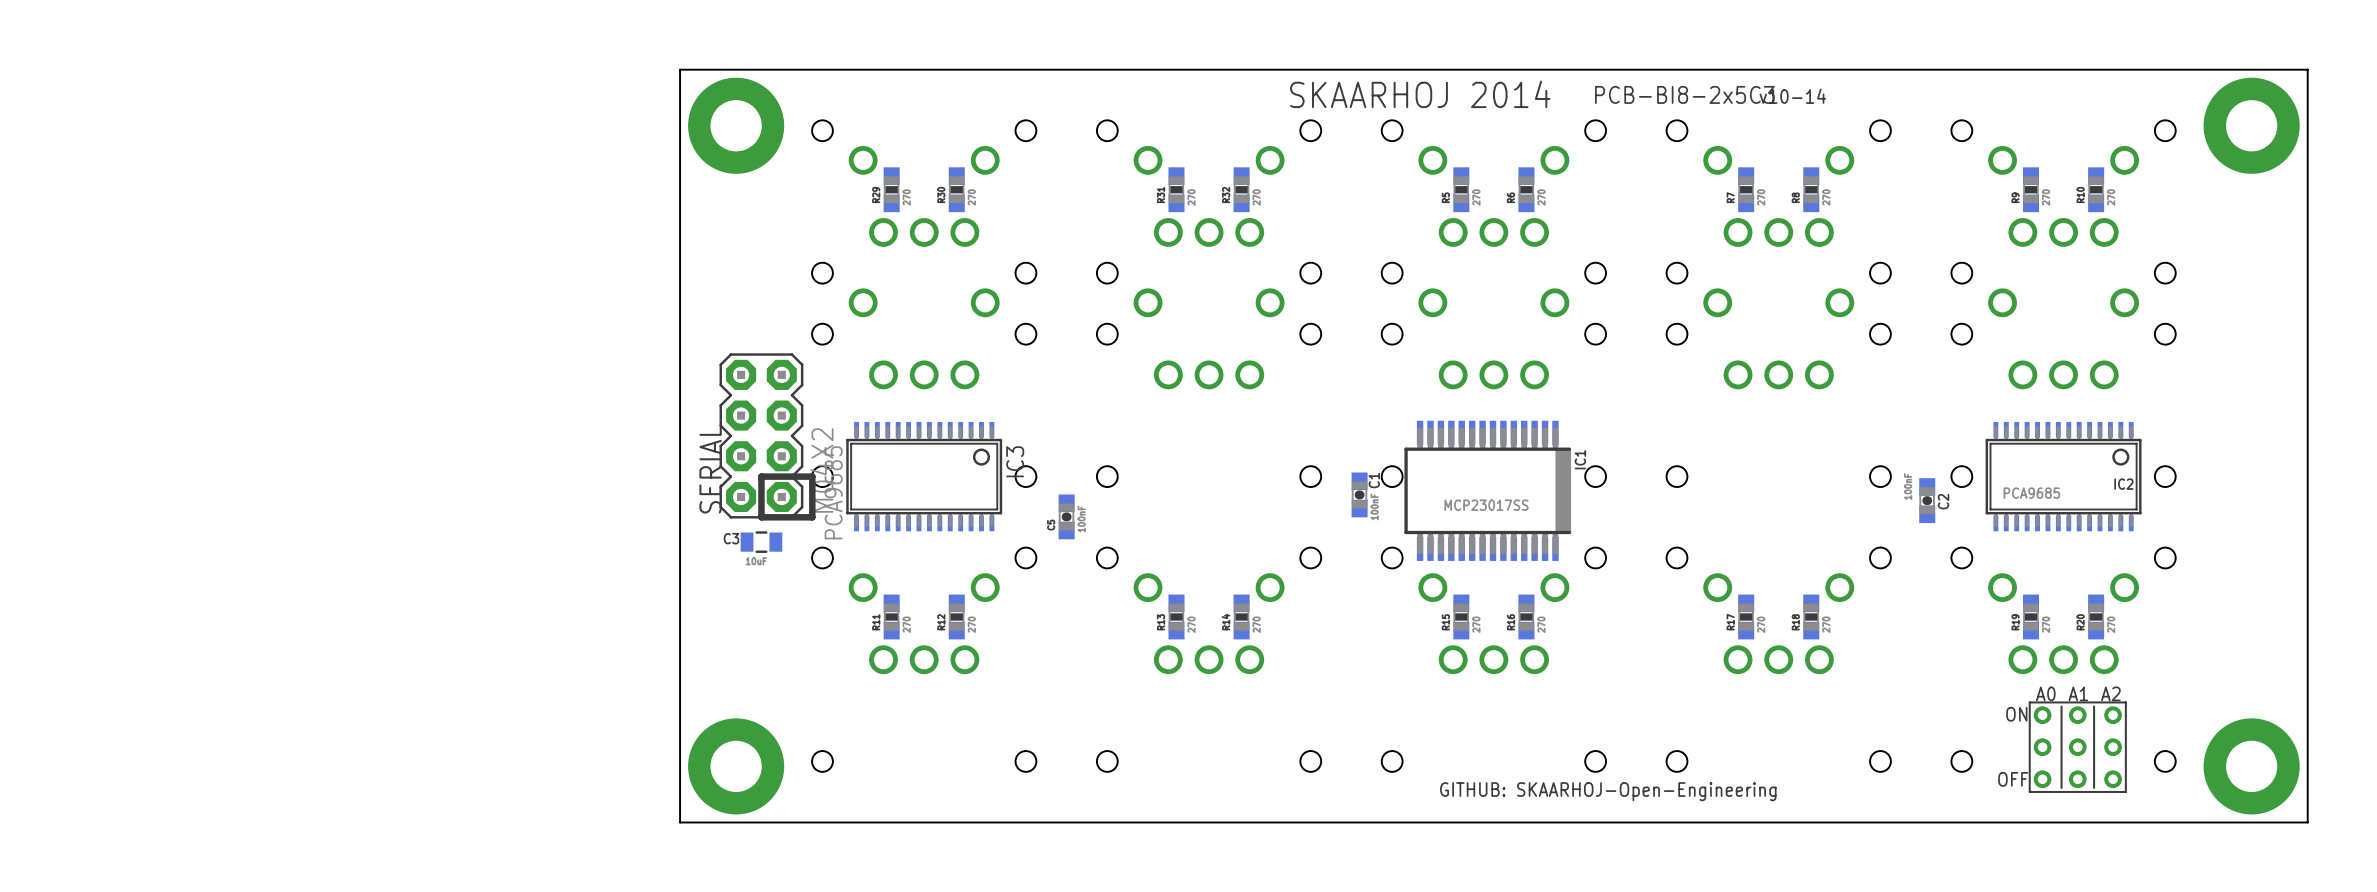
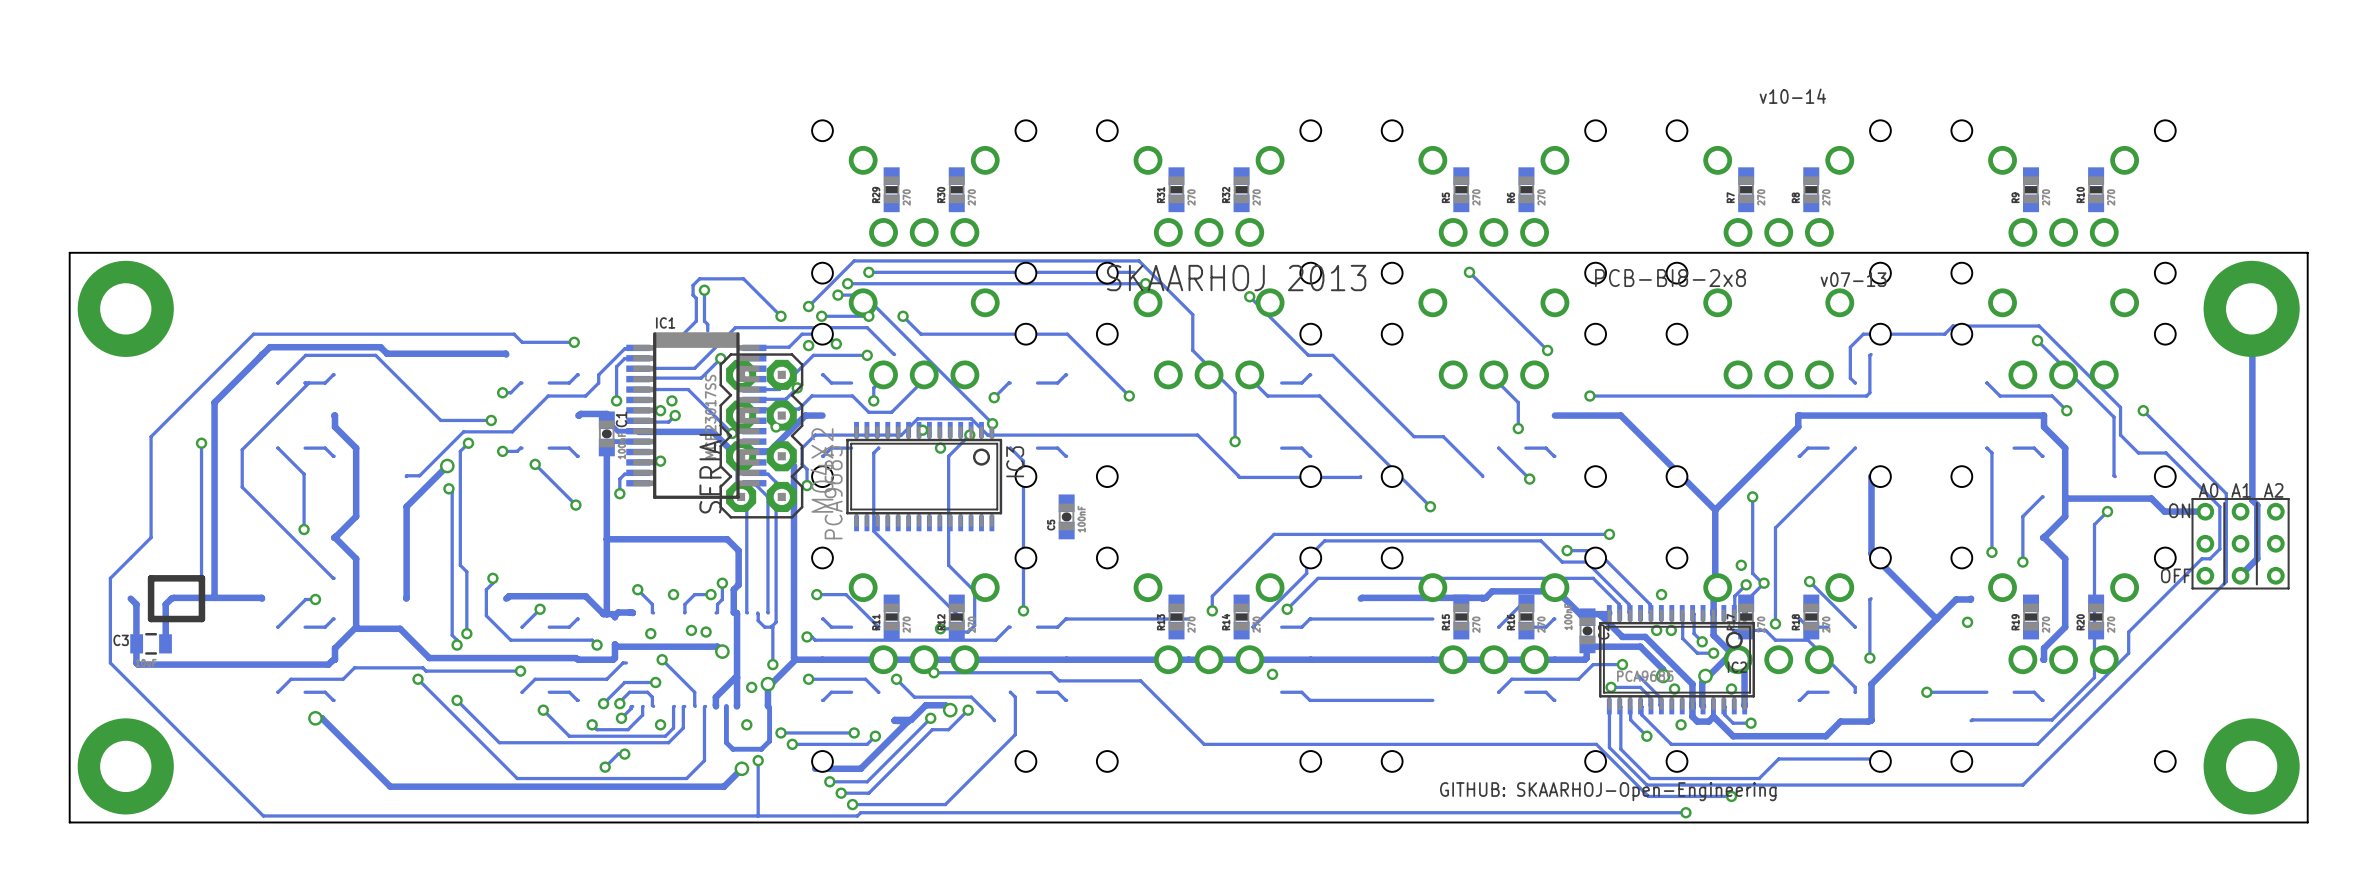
text: SKAARHOJ 2014 (1420, 94) -> none
text: PCB-BI8-2x5C3 (1684, 94) -> none
part: (736, 125) -> none
part position: (2251, 125) -> (2251, 308)
board edge: (2307, 252) (2307, 69) (680, 69) (680, 822) -> (2307, 252) (69, 252) (69, 822) (680, 822)
via: none -> (868, 272)
track: none -> (1134, 272) (868, 272)
track: none -> (1469, 272) (1547, 350)
via: none -> (1469, 272)
text: none -> SKAARHOJ 2013 (1236, 278)
text: none -> PCB-BI8-2x8 (1670, 278)
text: none -> v07-13 (1853, 279)
via: none -> (847, 283)
track: none -> (1145, 283) (847, 283)
via: none -> (1145, 283)
track: none -> (704, 290) (704, 321) (707, 324) (707, 330)
via: none -> (704, 290)
track: none -> (837, 295) (863, 295) (992, 423)
via: none -> (837, 295)
track: none -> (1249, 296) (1308, 355) (1332, 355) (1414, 436) (1443, 436) (1482, 476)
via: none -> (1249, 296)
track: none -> (808, 306) (854, 260) (1139, 260) (1192, 314) (1192, 350) (1235, 392) (1235, 441)
via: none -> (808, 306)
part: none -> (125, 308)
track: none -> (2251, 308) (2252, 500) (2257, 505) (2257, 558) (2240, 575)
track: none -> (780, 316) (743, 278) (699, 278) (693, 285) (693, 295) (696, 298) (696, 321) (671, 345)
via: none -> (780, 316)
via: none -> (821, 316)
track: none -> (868, 316) (821, 316)
via: none -> (868, 316)
track: none -> (903, 316) (920, 334) (1067, 334) (1129, 396)
via: none -> (903, 316)
track: none -> (2037, 340) (2114, 417) (2115, 476)
via: none -> (2037, 340)
track: none -> (574, 342) (522, 342) (514, 334) (253, 334) (151, 436) (151, 537) (110, 578) (110, 662) (263, 815) (857, 815) (860, 812) (1685, 812)
via: none -> (574, 342)
track: none -> (836, 343) (826, 334) (802, 334) (789, 347) (754, 347)
via: none -> (836, 343)
via: none -> (808, 345)
track: none -> (638, 347) (624, 348) (598, 374) (598, 383) (585, 396) (548, 396) (512, 431) (463, 431) (419, 475) (406, 476)
via: none -> (1547, 350)
track: none -> (506, 354) (387, 353) (380, 347) (269, 347) (214, 402) (214, 597)
track: none -> (894, 354) (867, 327) (735, 327) (694, 368) (638, 368)
track: none -> (1871, 354) (1869, 392) (1866, 396) (1589, 396)
track: none -> (867, 355) (813, 355) (779, 389) (754, 389)
via: none -> (867, 355)
track: none -> (638, 358) (624, 358) (616, 366) (616, 400)
track: none -> (720, 358) (701, 378) (638, 379)
via: none -> (720, 358)
track: none -> (334, 374) (325, 383) (305, 383)
track: none -> (578, 374) (569, 383) (549, 383)
track: none -> (822, 374) (831, 383) (851, 383)
track: none -> (1066, 374) (1057, 383) (1037, 383)
track: none -> (1310, 374) (1301, 383) (1281, 383)
track: none -> (927, 376) (891, 412) (868, 412) (852, 396) (811, 396) (798, 409) (754, 410)
track: none -> (278, 383) (305, 355) (375, 355) (440, 420) (491, 420)
track: none -> (308, 383) (242, 449) (242, 487) (334, 578)
track: none -> (521, 383) (510, 392) (502, 392)
track: none -> (878, 383) (873, 387) (873, 400)
track: none -> (1010, 383) (994, 397)
track: none -> (1254, 383) (1267, 396) (1319, 396) (1430, 506)
track: none -> (1498, 383) (1518, 402) (1518, 428)
track: none -> (1855, 383) (1850, 378) (1850, 347) (1863, 334) (1944, 334) (1952, 326) (2039, 326) (2120, 407) (2120, 435) (2138, 453) (2166, 453) (2219, 506) (2219, 549) (2210, 558) (2201, 558) (2128, 632) (2128, 653) (2037, 744) (1671, 744) (1642, 715) (1640, 706)
track: none -> (1987, 383) (2000, 396) (2052, 396) (2066, 410)
track: none -> (797, 387) (785, 399) (754, 399)
via: none -> (797, 387)
track: none -> (638, 389) (688, 389) (732, 433)
via: none -> (502, 392)
via: none -> (1129, 396)
via: none -> (1589, 396)
via: none -> (994, 397)
via: none -> (616, 400)
via: none -> (671, 400)
via: none -> (873, 400)
via: none -> (660, 410)
via: none -> (2066, 410)
track: none -> (2143, 410) (2226, 493) (2226, 581) (2022, 785) (1646, 785) (1609, 747) (1609, 706)
via: none -> (2143, 410)
track: none -> (334, 415) (335, 426) (356, 448) (356, 516) (334, 537) (356, 558) (356, 627)
track: none -> (675, 415) (668, 422) (638, 420)
via: none -> (675, 415)
track: none -> (822, 415) (805, 415) (769, 451) (754, 452) (732, 451) (712, 431) (617, 431) (606, 420) (606, 413) (578, 415)
track: none -> (1554, 415) (1620, 415) (1715, 509)
via: none -> (491, 420)
via: none -> (992, 423)
via: none -> (776, 426)
via: none -> (1518, 428)
via: none -> (922, 430)
via: none -> (732, 433)
track: none -> (969, 435) (948, 456) (948, 565) (974, 591) (974, 625) (968, 632) (958, 632) (955, 628) (940, 628)
via: none -> (969, 435)
track: none -> (638, 441) (612, 441) (606, 447) (606, 614)
via: none -> (1235, 441)
track: none -> (201, 443) (201, 584)
via: none -> (201, 443)
track: none -> (468, 443) (460, 451) (460, 565) (466, 571) (466, 633)
via: none -> (468, 443)
track: none -> (774, 446) (794, 466) (794, 658) (795, 659)
track: none -> (278, 448) (304, 474) (304, 529)
track: none -> (305, 448) (325, 448) (334, 456)
track: none -> (521, 448) (517, 451) (502, 451)
track: none -> (549, 448) (569, 448) (578, 456)
track: none -> (851, 448) (831, 448) (822, 456)
track: none -> (878, 448) (873, 453) (873, 531) (963, 620)
via: none -> (940, 448)
track: none -> (1010, 448) (1023, 461) (1023, 610)
track: none -> (1037, 448) (1057, 448) (1066, 456)
track: none -> (1281, 448) (1301, 448) (1310, 456)
track: none -> (1498, 448) (1529, 479)
track: none -> (1525, 448) (1545, 448) (1554, 456)
track: none -> (1828, 448) (1808, 448) (1799, 456)
track: none -> (1855, 448) (1775, 527) (1775, 623)
track: none -> (1987, 448) (1991, 453) (1991, 552)
track: none -> (2014, 448) (2034, 448) (2043, 456)
via: none -> (502, 451)
via: none -> (660, 461)
track: none -> (754, 462) (741, 462) (737, 467) (737, 496) (746, 506) (747, 612)
track: none -> (535, 464) (575, 505)
via: none -> (535, 464)
track: none -> (447, 466) (406, 506) (406, 598)
via: none -> (447, 466)
track: none -> (638, 472) (624, 474) (619, 479) (619, 493)
track: none -> (754, 472) (767, 474) (776, 482) (776, 622) (771, 627) (764, 627) (758, 620) (757, 612)
line: (812, 476) (812, 517) (761, 517) (761, 476) (812, 476) -> none
track: none -> (1360, 476) (1239, 477) (1197, 435) (987, 435) (971, 418) (917, 418) (901, 435) (815, 435) (802, 448) (802, 464) (807, 469) (807, 485)
track: none -> (1871, 476) (1871, 553) (1936, 619)
IC2 position: (2063, 476) -> (1677, 659)
via: none -> (1529, 479)
track: none -> (754, 483) (767, 496) (768, 612)
via: none -> (807, 485)
track: none -> (448, 488) (452, 492) (452, 635) (457, 640) (457, 645)
via: none -> (448, 488)
IC1 rotation: 0° (1487, 490) -> 90° counterclockwise (696, 415)
IC1 position: (1487, 490) -> (696, 415)
via: none -> (619, 493)
C1 position: (1359, 494) -> (606, 433)
track: none -> (1752, 496) (1752, 573) (1764, 583) (1746, 601) (1744, 612)
via: none -> (1752, 496)
track: none -> (2043, 496) (2022, 516) (2022, 562)
track: none -> (2065, 498) (2151, 498) (2164, 511) (2205, 511)
C2 position: (1927, 500) -> (1587, 630)
via: none -> (575, 505)
via: none -> (1430, 506)
track: none -> (1715, 509) (1798, 426) (1798, 415) (2044, 415) (2044, 426) (2065, 448) (2065, 516) (2043, 537) (2065, 558) (2065, 627) (2044, 648) (2043, 659)
track: none -> (1715, 509) (1713, 635) (1744, 666) (1744, 706)
track: none -> (2107, 511) (2094, 524) (2094, 677) (2052, 719) (1971, 720)
via: none -> (2107, 511)
via: none -> (304, 529)
track: none -> (1609, 534) (1274, 534) (1212, 596) (1212, 610)
via: none -> (1609, 534)
track: none -> (606, 539) (727, 539) (738, 550) (738, 584) (733, 589) (733, 612) (737, 614) (736, 706)
C3 position: (761, 542) -> (151, 643)
track: none -> (1567, 550) (1596, 550) (1650, 604) (1650, 612)
via: none -> (1567, 550)
via: none -> (1991, 552)
via: none -> (2022, 562)
via: none -> (1741, 565)
line: none -> (201, 578) (201, 619) (151, 619) (151, 578) (201, 578)
track: none -> (492, 578) (492, 583) (486, 589) (486, 615) (510, 640) (592, 640) (597, 645)
via: none -> (492, 578)
track: none -> (1809, 581) (1855, 627)
via: none -> (1809, 581)
track: none -> (722, 583) (722, 599) (717, 604) (716, 612)
via: none -> (722, 583)
via: none -> (1764, 583)
track: none -> (1746, 584) (1734, 596) (1734, 612)
via: none -> (1746, 584)
track: none -> (637, 589) (652, 604) (653, 612)
via: none -> (637, 589)
via: none -> (673, 594)
track: none -> (710, 594) (694, 594) (684, 604) (684, 612)
via: none -> (710, 594)
track: none -> (816, 594) (846, 594) (878, 627)
via: none -> (816, 594)
via: none -> (1661, 594)
track: none -> (130, 598) (136, 604) (136, 662) (138, 664) (328, 664) (335, 659) (335, 648) (356, 627)
track: none -> (262, 598) (171, 598) (165, 604) (165, 643)
track: none -> (506, 598) (509, 596) (585, 596) (603, 614) (613, 614) (614, 617) (618, 612) (632, 612)
track: none -> (1360, 598) (1482, 598) (1492, 591) (1557, 591) (1581, 615) (1587, 617) (1589, 614) (1609, 612)
track: none -> (1871, 598) (1869, 658)
track: none -> (1971, 598) (1956, 599) (1871, 684) (1871, 720) (1840, 721) (1825, 736) (1733, 736) (1713, 716) (1708, 721) (1697, 721) (1692, 716) (1692, 684) (1645, 636) (1622, 636) (1601, 614)
track: none -> (315, 599) (305, 599) (278, 627)
via: none -> (315, 599)
track: none -> (1529, 604) (1521, 604) (1498, 627)
track: none -> (540, 609) (522, 627)
via: none -> (540, 609)
track: none -> (1287, 609) (1318, 578) (1593, 578) (1619, 604) (1619, 612)
via: none -> (1287, 609)
via: none -> (1023, 610)
via: none -> (1212, 610)
track: none -> (1630, 612) (1628, 604) (1586, 562) (1562, 562) (1541, 540) (1324, 540) (1306, 558) (1306, 573) (1254, 627)
track: none -> (1682, 612) (1682, 638) (1697, 653) (1713, 653)
track: none -> (1692, 612) (1694, 633) (1702, 641)
track: none -> (334, 619) (325, 627) (305, 627)
track: none -> (578, 619) (569, 627) (549, 627)
track: none -> (822, 619) (831, 627) (851, 627)
track: none -> (1188, 619) (1065, 619) (1057, 627) (1037, 627)
track: none -> (1432, 619) (1309, 619) (1301, 627) (1281, 627)
track: none -> (1554, 619) (1545, 627) (1525, 627)
track: none -> (1799, 619) (1808, 627) (1828, 627)
via: none -> (1967, 622)
via: none -> (1775, 623)
track: none -> (772, 626) (772, 664)
track: none -> (356, 627) (357, 628) (400, 628) (429, 658) (613, 659) (614, 644) (616, 646) (717, 646) (722, 651)
track: none -> (1010, 627) (995, 640) (815, 640) (811, 636) (807, 636)
via: none -> (940, 628)
via: none -> (691, 630)
via: none -> (1656, 630)
via: none -> (1671, 630)
track: none -> (1733, 630) (1765, 630) (1775, 640) (1808, 640) (1855, 687) (1855, 692)
via: none -> (706, 632)
via: none -> (466, 633)
via: none -> (650, 633)
via: none -> (807, 636)
via: none -> (1702, 641)
via: none -> (457, 645)
via: none -> (597, 645)
via: none -> (722, 651)
via: none -> (1713, 653)
track: none -> (1731, 653) (1702, 682) (1703, 706)
via: none -> (1869, 658)
track: none -> (662, 659) (694, 692) (695, 706)
via: none -> (662, 659)
track: none -> (795, 659) (1585, 659) (1587, 644) (1588, 646) (1640, 646) (1663, 669) (1663, 675)
track: none -> (795, 659) (767, 687) (769, 741) (761, 749) (732, 749) (726, 742) (726, 706)
track: none -> (626, 662) (623, 662) (606, 679) (535, 679) (522, 692)
via: none -> (772, 664)
track: none -> (1622, 664) (1593, 664) (1578, 679) (1511, 679) (1498, 692)
via: none -> (1622, 664)
track: none -> (520, 671) (426, 671) (422, 667) (354, 667) (343, 679) (291, 679) (278, 692)
via: none -> (520, 671)
track: none -> (933, 672) (1051, 672) (1059, 680) (1140, 680) (1204, 744) (1596, 744) (1648, 796) (1731, 796)
via: none -> (933, 672)
via: none -> (1272, 674)
track: none -> (1638, 675) (1659, 697) (1661, 706)
via: none -> (1663, 675)
via: none -> (1705, 675)
track: none -> (737, 677) (715, 697) (716, 706)
track: none -> (418, 679) (517, 778) (686, 778) (704, 760) (705, 706)
via: none -> (418, 679)
track: none -> (808, 679) (865, 679) (878, 692)
via: none -> (808, 679)
track: none -> (896, 679) (914, 697) (971, 697) (994, 720)
via: none -> (896, 679)
track: none -> (655, 682) (624, 682) (603, 703)
via: none -> (655, 682)
via: none -> (767, 684)
via: none -> (751, 687)
track: none -> (1611, 687) (1640, 687) (1650, 697) (1650, 706)
via: none -> (1611, 687)
via: none -> (1674, 689)
via: none -> (1731, 689)
track: none -> (305, 692) (325, 692) (334, 700)
track: none -> (549, 692) (569, 692) (578, 700)
track: none -> (851, 692) (831, 692) (822, 700)
track: none -> (1010, 692) (1015, 697) (1015, 734) (945, 804) (852, 804)
track: none -> (1037, 692) (1057, 692) (1066, 700)
track: none -> (1281, 692) (1301, 692) (1309, 700) (1432, 700)
track: none -> (1525, 692) (1545, 692) (1554, 700)
track: none -> (1828, 692) (1808, 692) (1799, 700)
via: none -> (1926, 692)
track: none -> (1986, 692) (1926, 692)
track: none -> (2014, 692) (2034, 692) (2043, 700)
track: none -> (457, 700) (499, 742) (668, 742) (683, 728) (684, 706)
via: none -> (457, 700)
via: none -> (603, 703)
track: none -> (619, 703) (629, 692) (647, 692) (652, 697) (653, 706)
via: none -> (619, 703)
track: none -> (632, 706) (621, 718)
track: none -> (643, 706) (642, 715) (627, 729) (597, 729) (592, 724)
track: none -> (674, 706) (673, 728) (665, 736) (569, 736) (543, 710)
track: none -> (1619, 706) (1620, 749) (1650, 778) (1759, 778) (1778, 759) (1879, 759)
track: none -> (1630, 706) (1630, 719) (1646, 736)
track: none -> (1723, 706) (1725, 715) (1733, 723) (1751, 723)
via: none -> (543, 710)
track: none -> (950, 710) (945, 705) (925, 705) (911, 719) (894, 719) (907, 721) (860, 768) (815, 768)
via: none -> (950, 710)
track: none -> (968, 710) (948, 729) (932, 729) (868, 793) (841, 793)
via: none -> (968, 710)
track: none -> (315, 718) (321, 718) (390, 786) (724, 786) (741, 768)
via: none -> (315, 718)
via: none -> (621, 718)
track: none -> (930, 718) (867, 781) (829, 781)
via: none -> (930, 718)
via: none -> (1751, 723)
via: none -> (592, 724)
via: none -> (660, 724)
via: none -> (746, 724)
via: none -> (1681, 724)
via: none -> (780, 732)
track: none -> (854, 732) (780, 732)
via: none -> (854, 732)
track: none -> (875, 736) (867, 744) (792, 744)
via: none -> (875, 736)
via: none -> (1646, 736)
via: none -> (792, 744)
part position: (2077, 747) -> (2240, 543)
track: none -> (624, 754) (618, 754) (605, 767)
via: none -> (624, 754)
track: none -> (758, 760) (758, 815)
via: none -> (758, 760)
part: none -> (125, 766)
part: (736, 766) -> none
via: none -> (605, 767)
via: none -> (741, 768)
via: none -> (829, 781)
via: none -> (841, 793)
via: none -> (1731, 796)
via: none -> (852, 804)
via: none -> (1685, 812)

